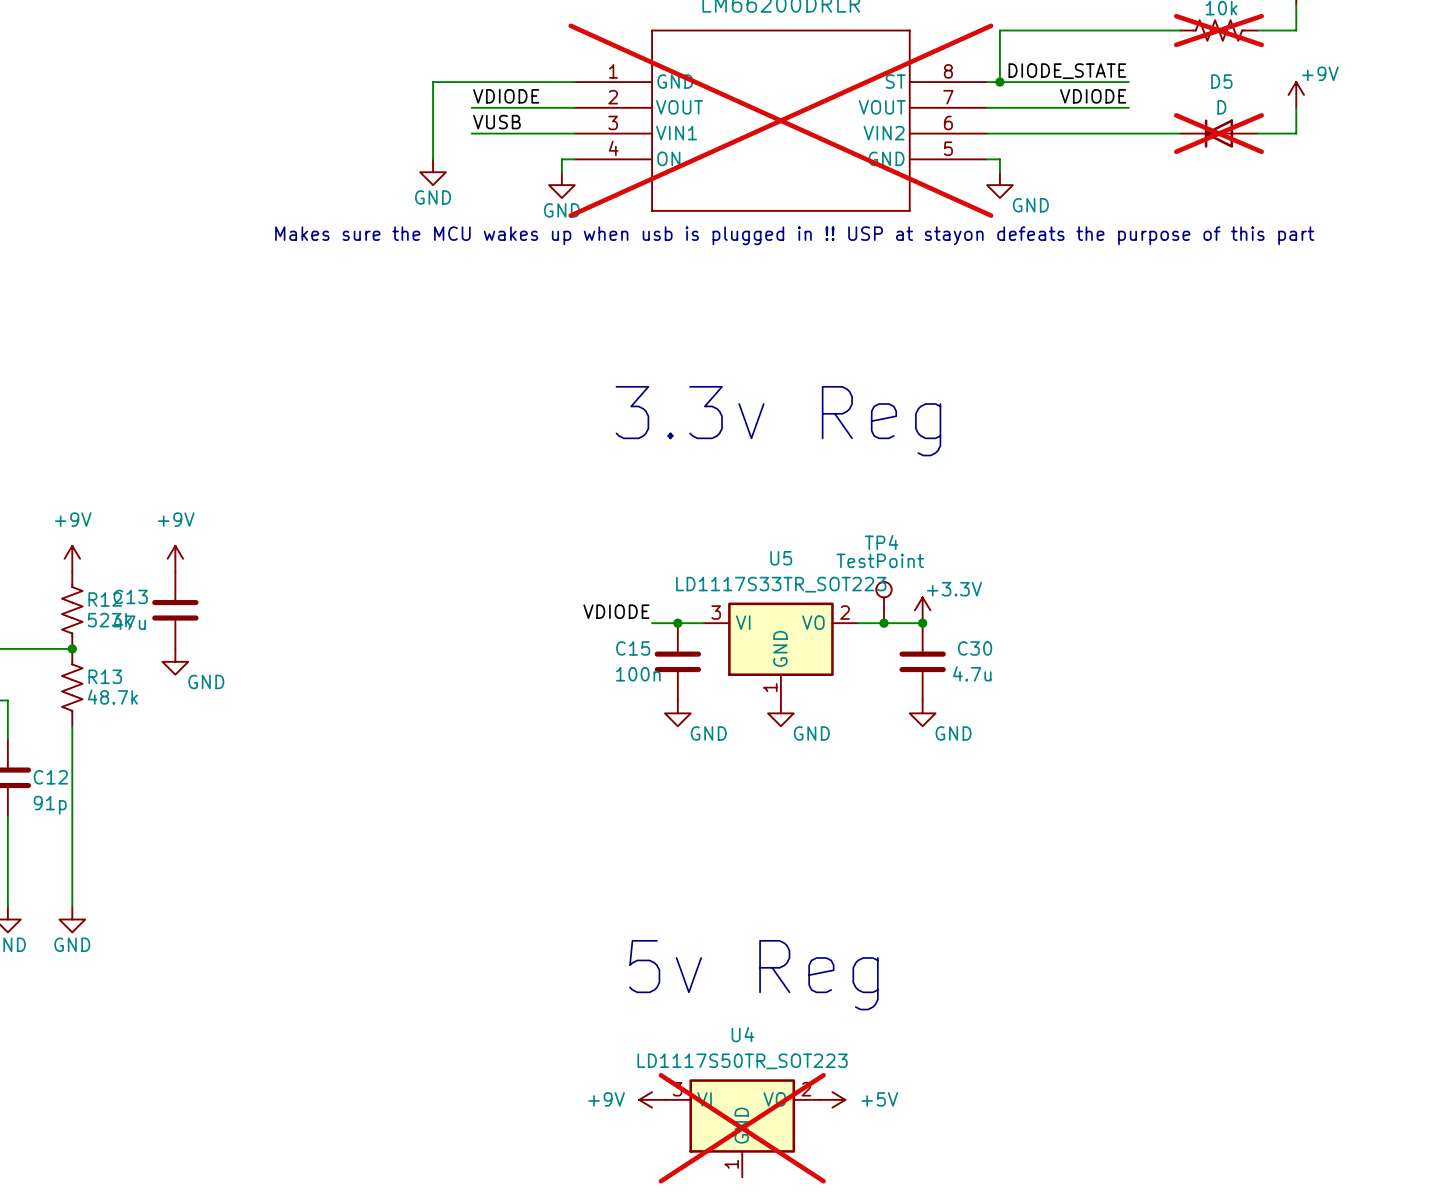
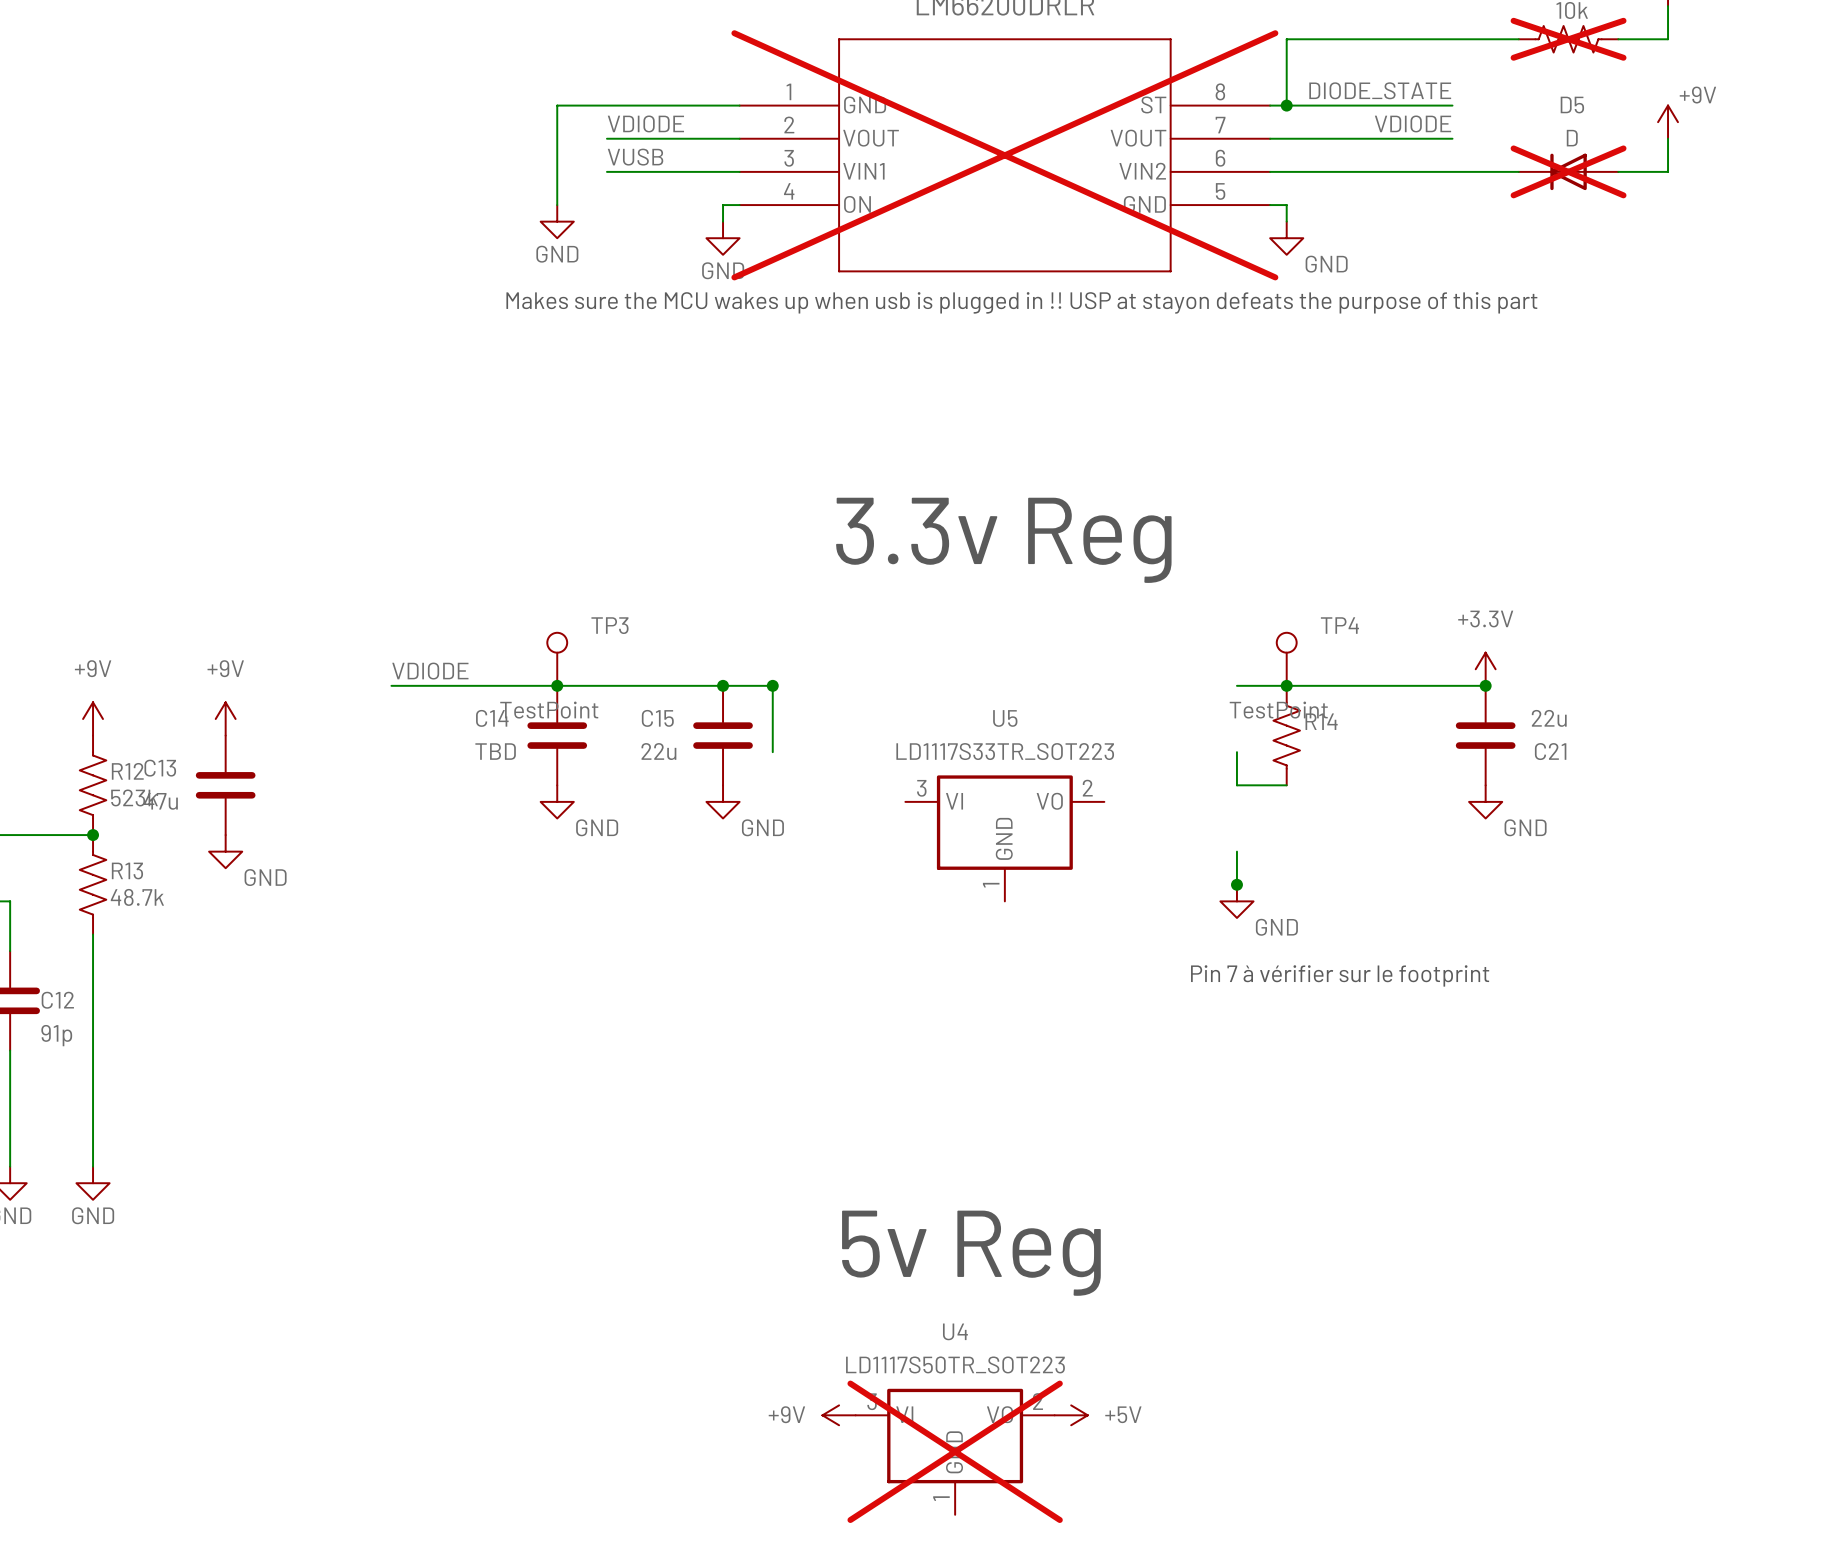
TP3: none -> TestPoint (557, 659)
label: none -> VDIODE (430, 671)
wire: none -> (391, 685) (772, 685) (772, 752)
junction: none -> (557, 685)
junction: none -> (723, 685)
junction: none -> (772, 685)
wire: none -> (1236, 685) (1485, 685)
junction: none -> (1286, 685)
junction: none -> (1485, 685)
TP4 name position: TP4 (881, 542) -> TP4 (1339, 625)
TP4 value position: TestPoint (880, 560) -> TestPoint (1278, 710)
C14: none -> TBD (557, 735)
R14: none -> (1286, 735)
C21: none -> 22u (1485, 735)
wire: none -> (1236, 752) (1236, 785) (1286, 785)
power symbol text position: +3.3V (954, 589) -> +3.3V (1485, 619)
TP4 position: (883, 602) -> (1286, 659)
power symbol position: +3.3V (922, 610) -> +3.3V (1485, 669)
label: VDIODE (616, 611) -> none
power symbol: none -> GND (557, 801)
power symbol: none -> GND (723, 801)
wire: (652, 623) (703, 623) -> none
junction: (677, 623) -> none
wire: (858, 623) (922, 623) -> none
junction: (883, 623) -> none
junction: (922, 623) -> none
power symbol: none -> GND (1485, 801)
C15 position: (677, 661) -> (723, 735)
C30: 4.7u (922, 661) -> none
wire: none -> (1236, 851) (1236, 884)
C15 value: 100n (638, 674) -> 22u (658, 751)
junction: none -> (1236, 884)
power symbol: GND (677, 713) -> none
power symbol: GND (780, 713) -> none
power symbol position: GND (922, 713) -> GND (1236, 901)
text: none -> Pin 7 à vérifier sur le footprint (1340, 975)

